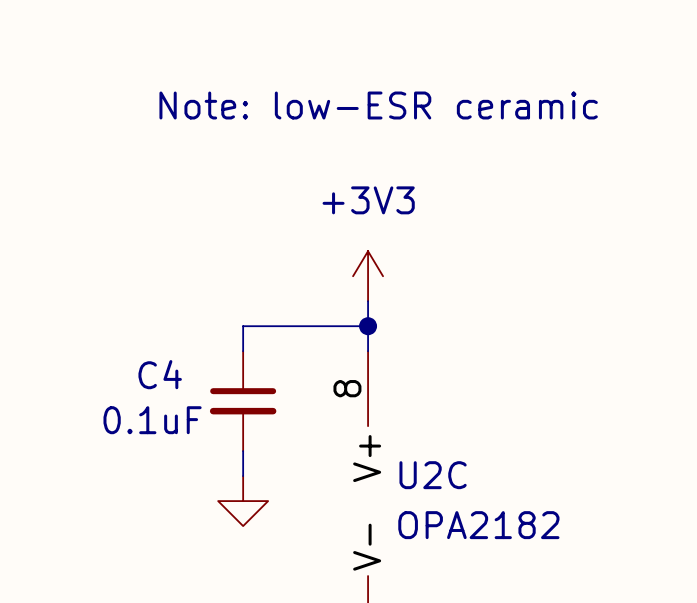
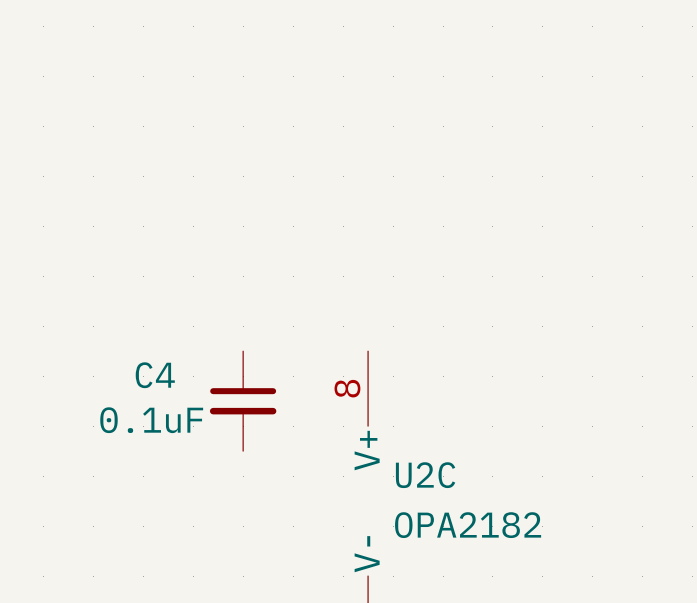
text: Note: low-ESR ceramic (378, 105) -> none
power symbol: +3V3 (368, 276) -> none
wire: (368, 301) (368, 351) -> none
wire: (368, 326) (243, 326) (243, 351) -> none
junction: (368, 326) -> none
wire: (243, 451) (243, 476) -> none
power symbol: (243, 501) -> none

